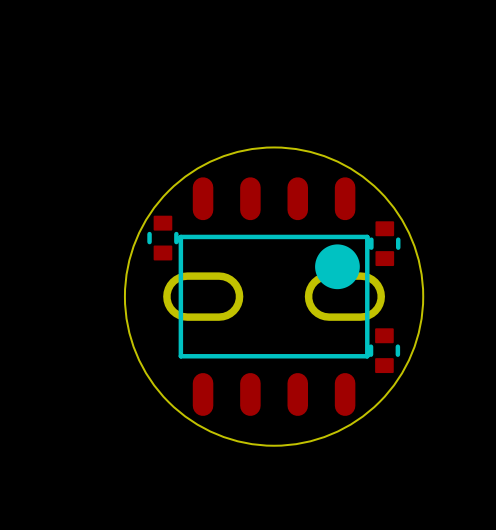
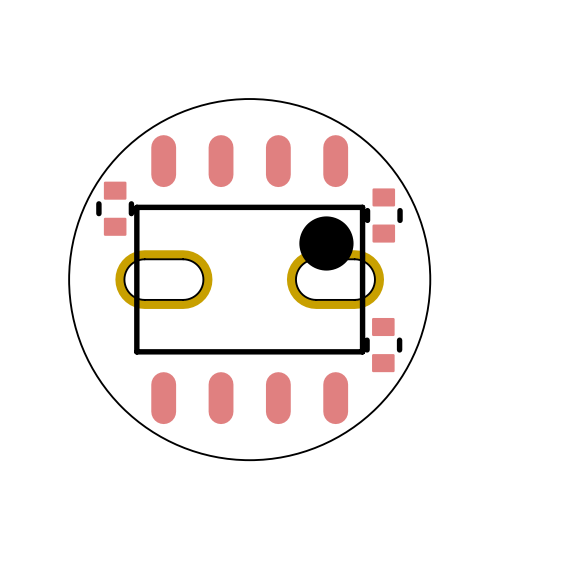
board edge: none -> (144, 259) (183, 259) (192, 261) (199, 268) (202, 274) (201, 289) (194, 296) (185, 299) (144, 299) (135, 297) (125, 286) (125, 274) (133, 262) (144, 259)
board edge: none -> (316, 259) (354, 259) (364, 262) (370, 267) (374, 274) (374, 282) (372, 289) (364, 297) (357, 299) (316, 299) (306, 297) (298, 289) (296, 274) (304, 262) (316, 259)

